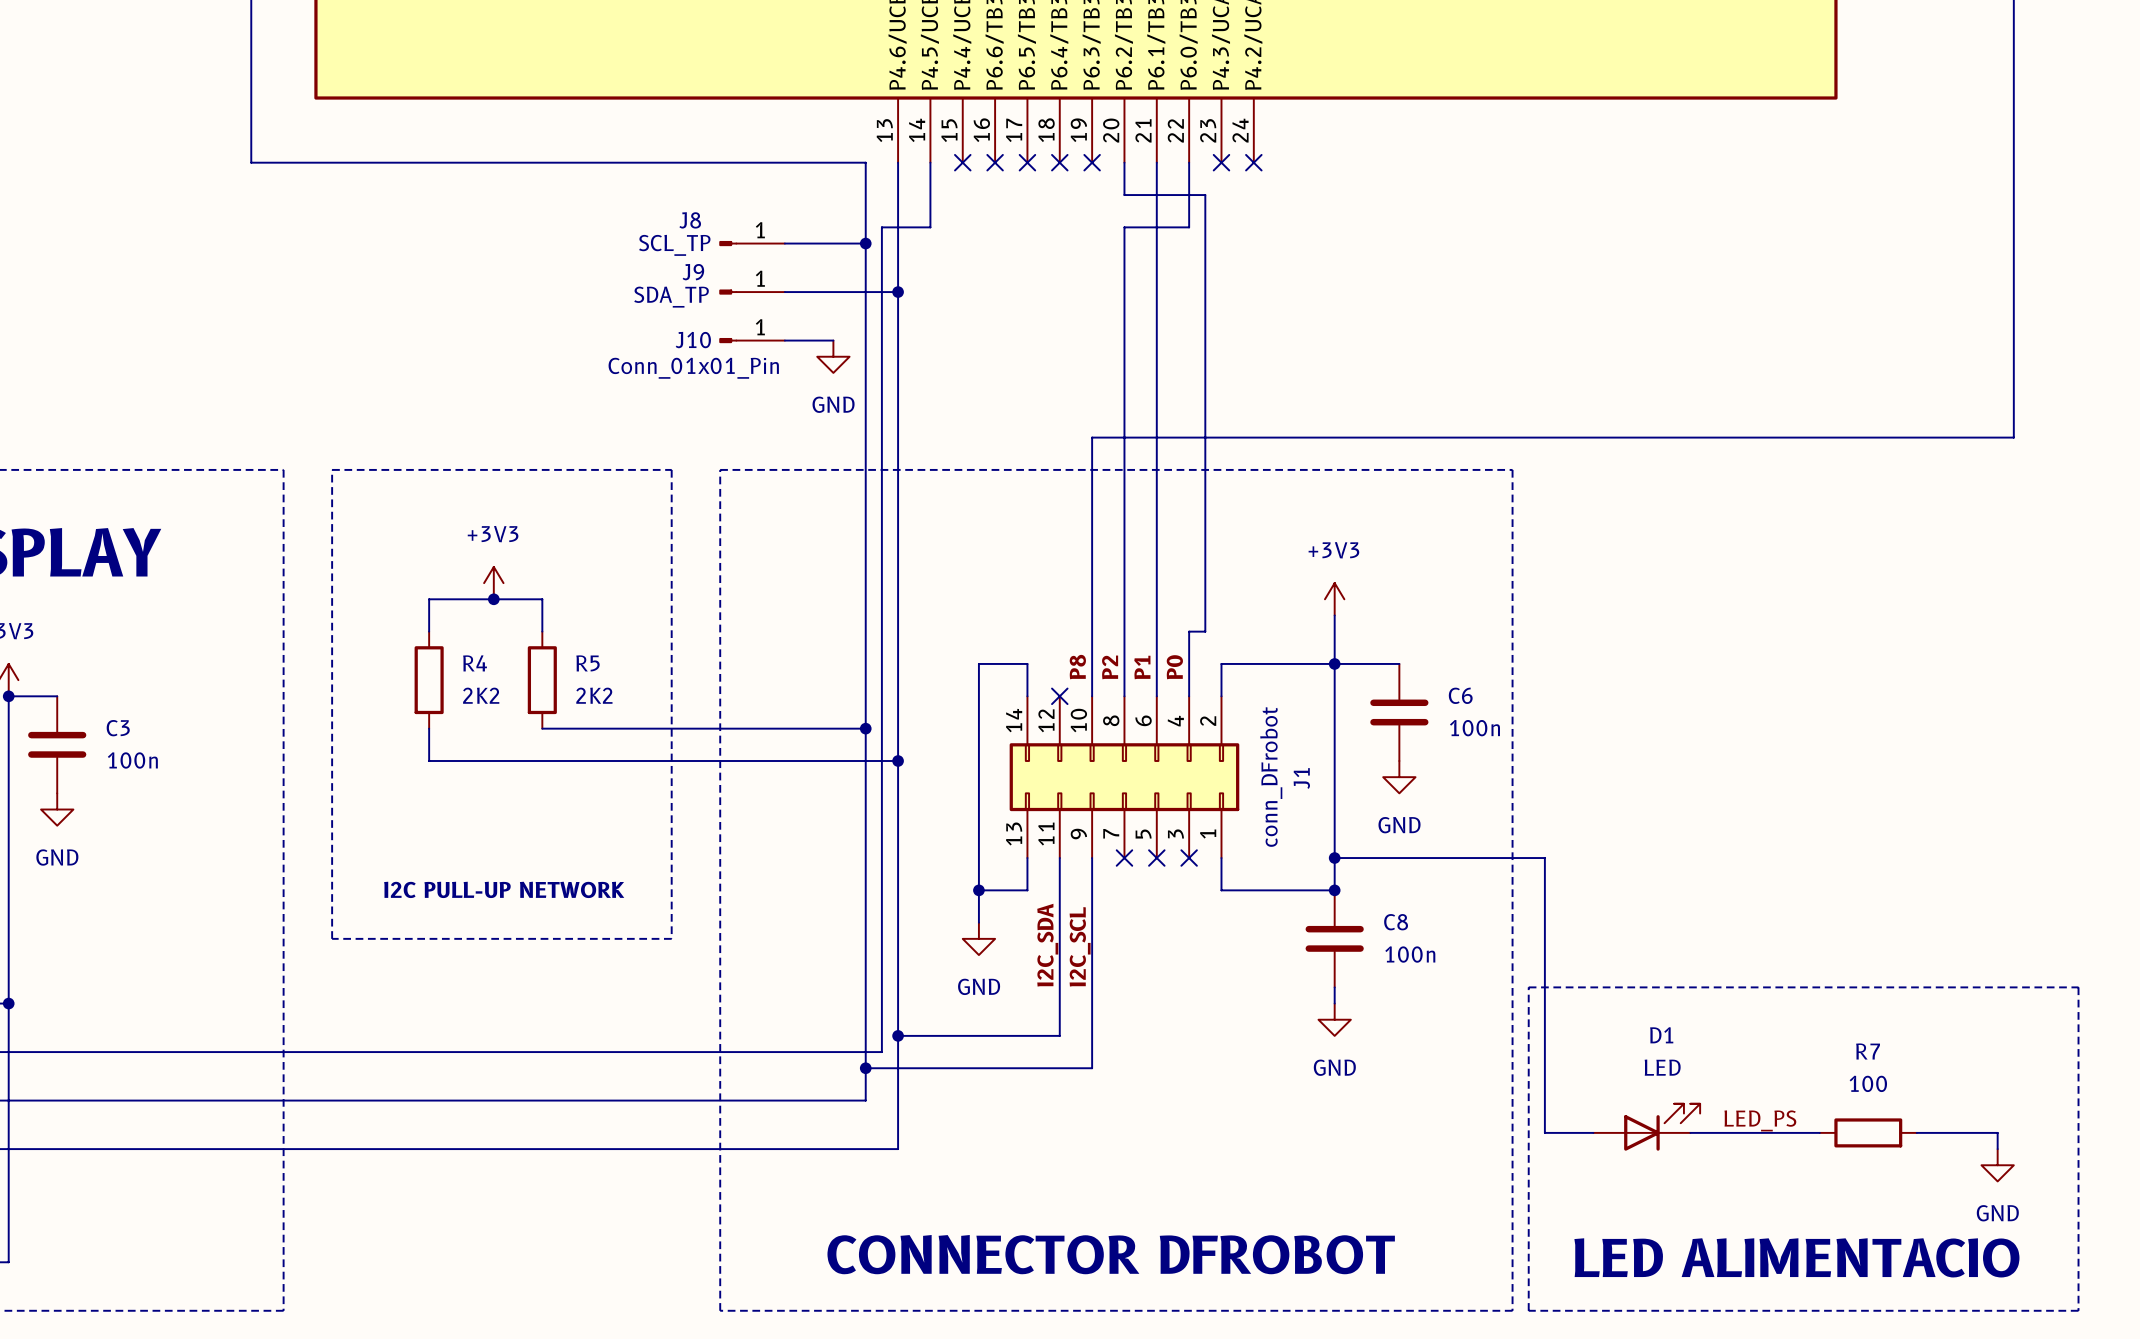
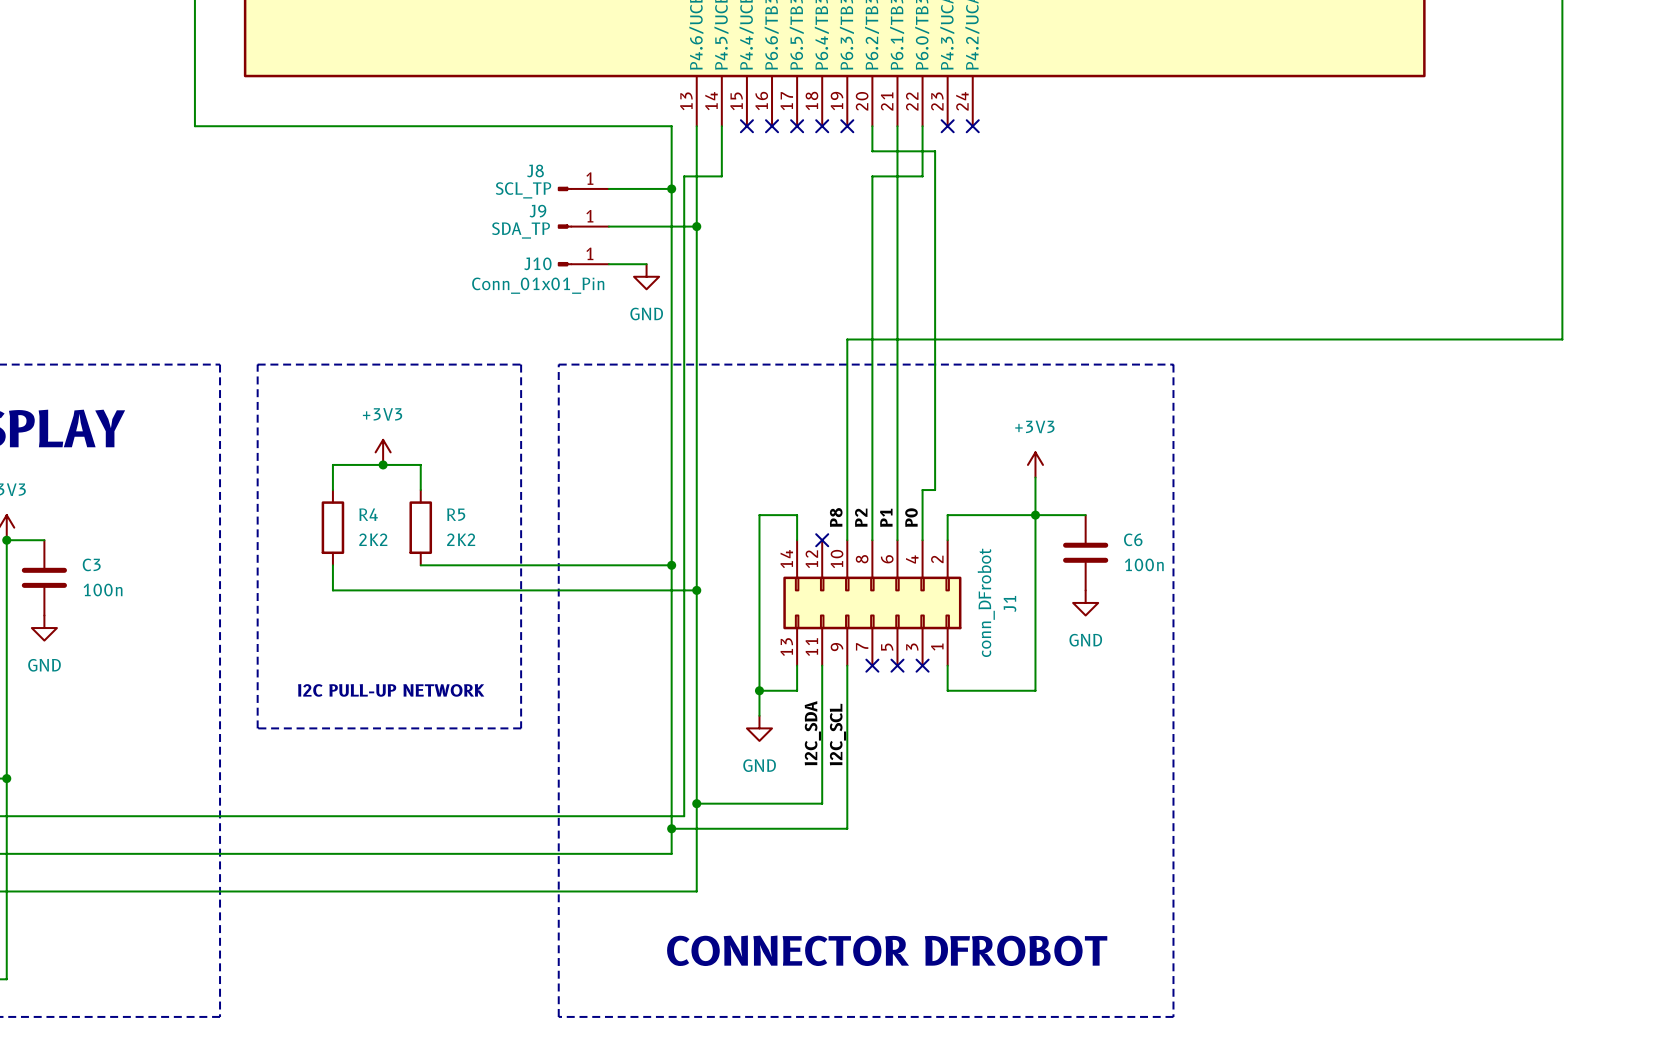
wire: (1334, 858) (1544, 858) (1544, 1132) (1593, 1132) -> none
junction: (1334, 858) -> none
junction: (1334, 890) -> none
C8: 100n (1334, 938) -> none
wire: (1334, 987) (1334, 1003) -> none
line: (1528, 987) (2078, 987) (2078, 1310) (1528, 1310) (1528, 987) -> none
power symbol: GND (1334, 1019) -> none
label: LED_PS (1760, 1120) -> none
D1: LED (1646, 1127) -> none
wire: (1690, 1132) (1819, 1132) -> none
R7: 100 (1868, 1132) -> none
wire: (1916, 1132) (1997, 1132) (1997, 1149) -> none
power symbol: GND (1997, 1165) -> none
text position: CONNECTOR DFROBOT (1111, 1254) -> CONNECTOR DFROBOT (887, 950)
text: LED ALIMENTACIO (1796, 1257) -> none

